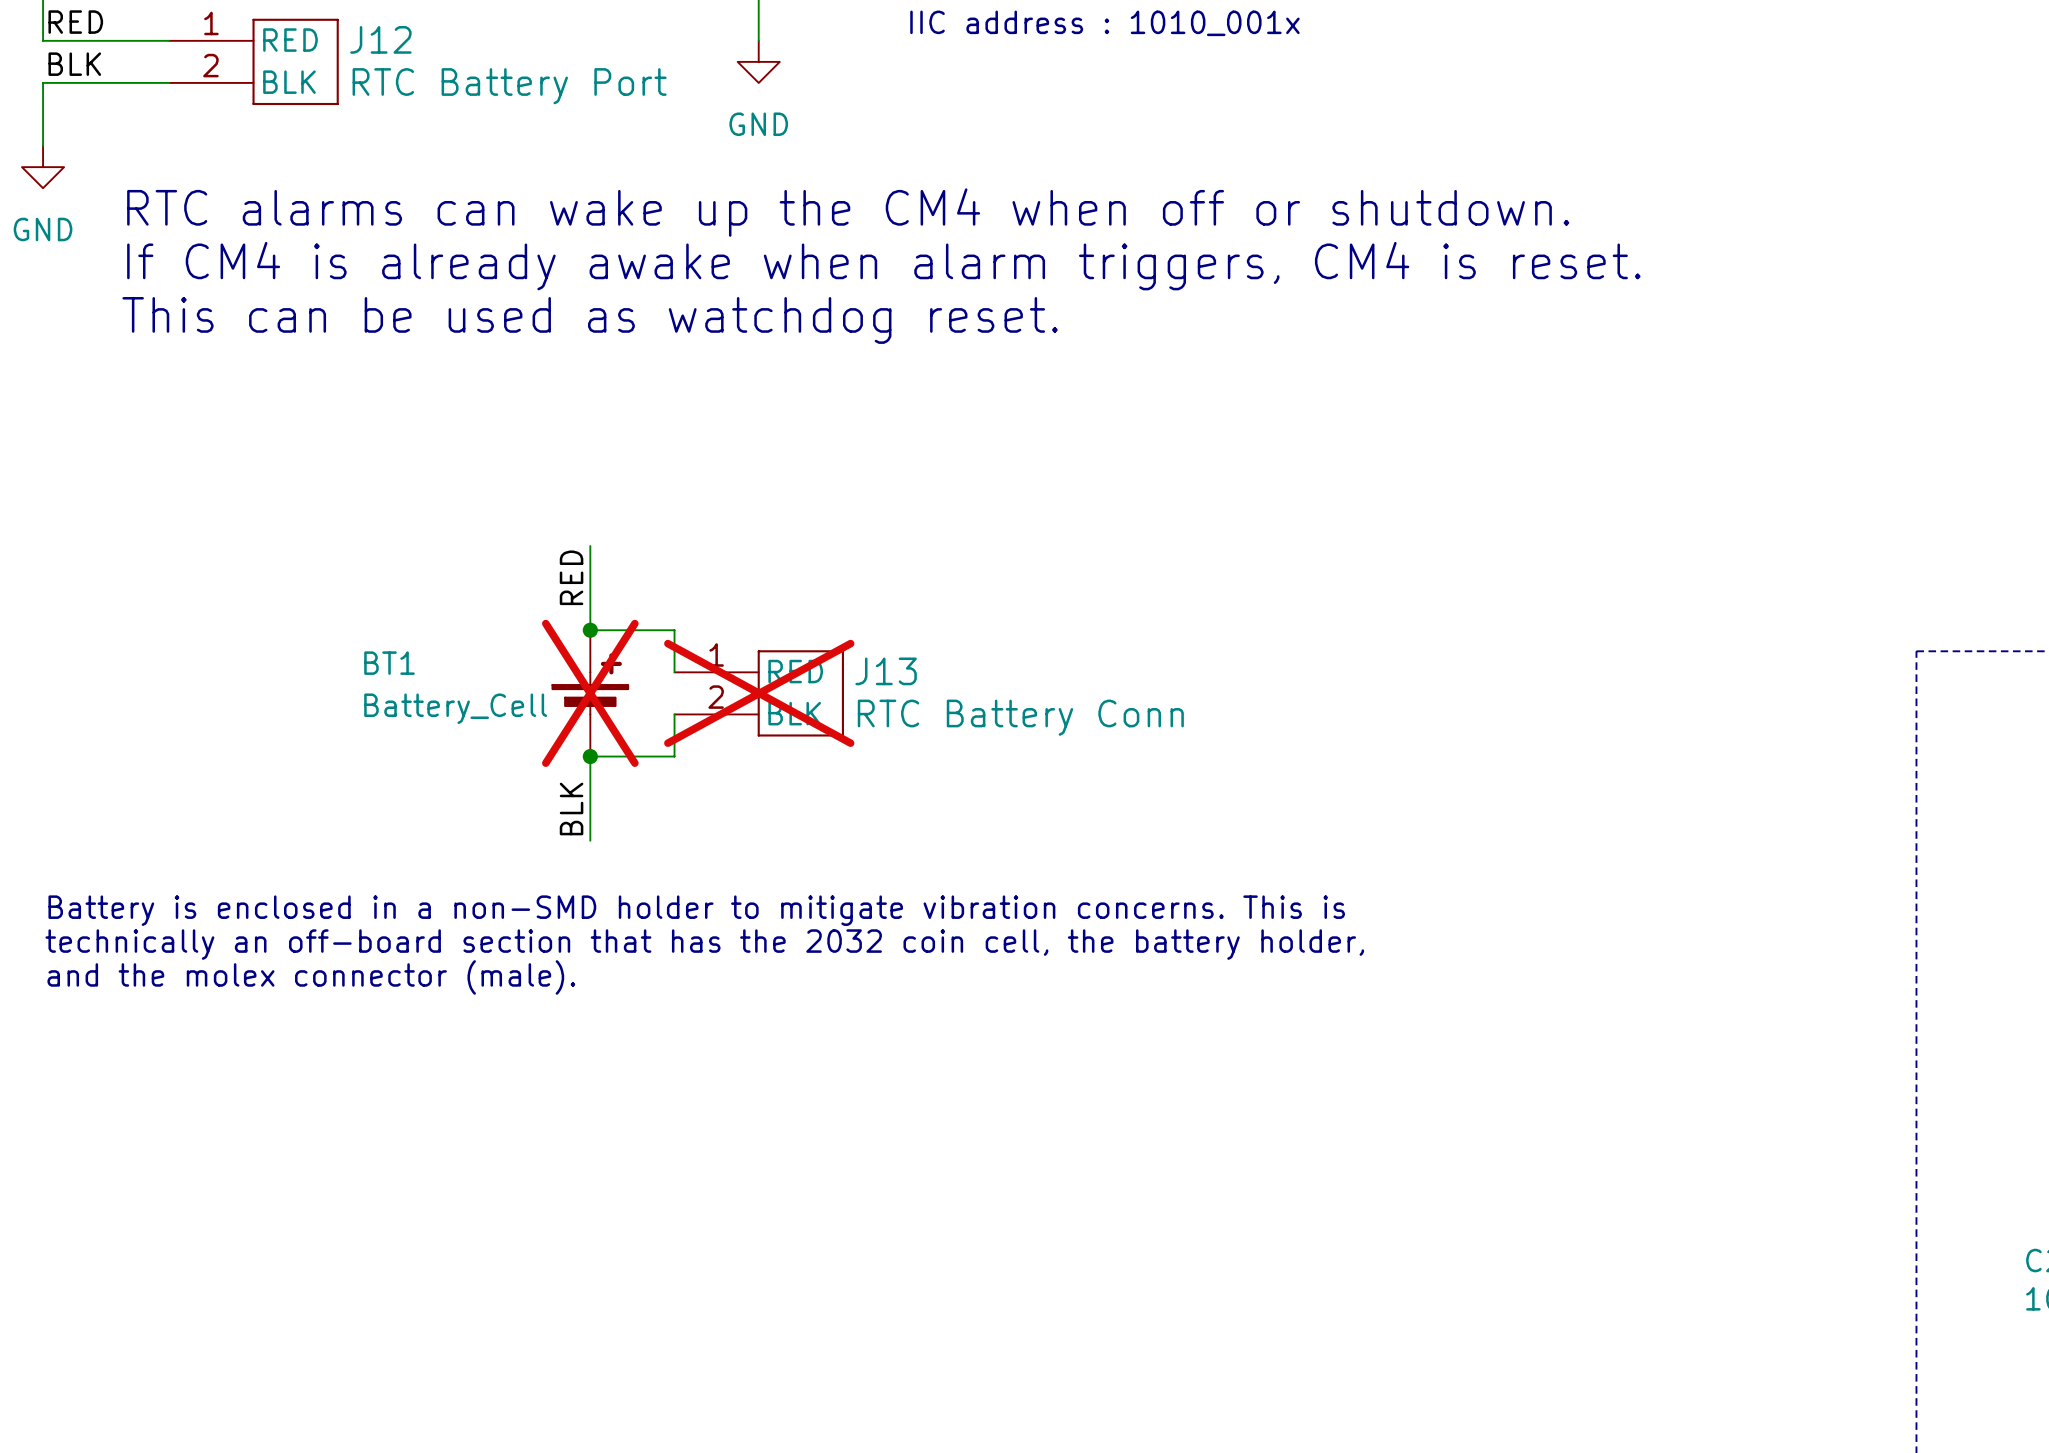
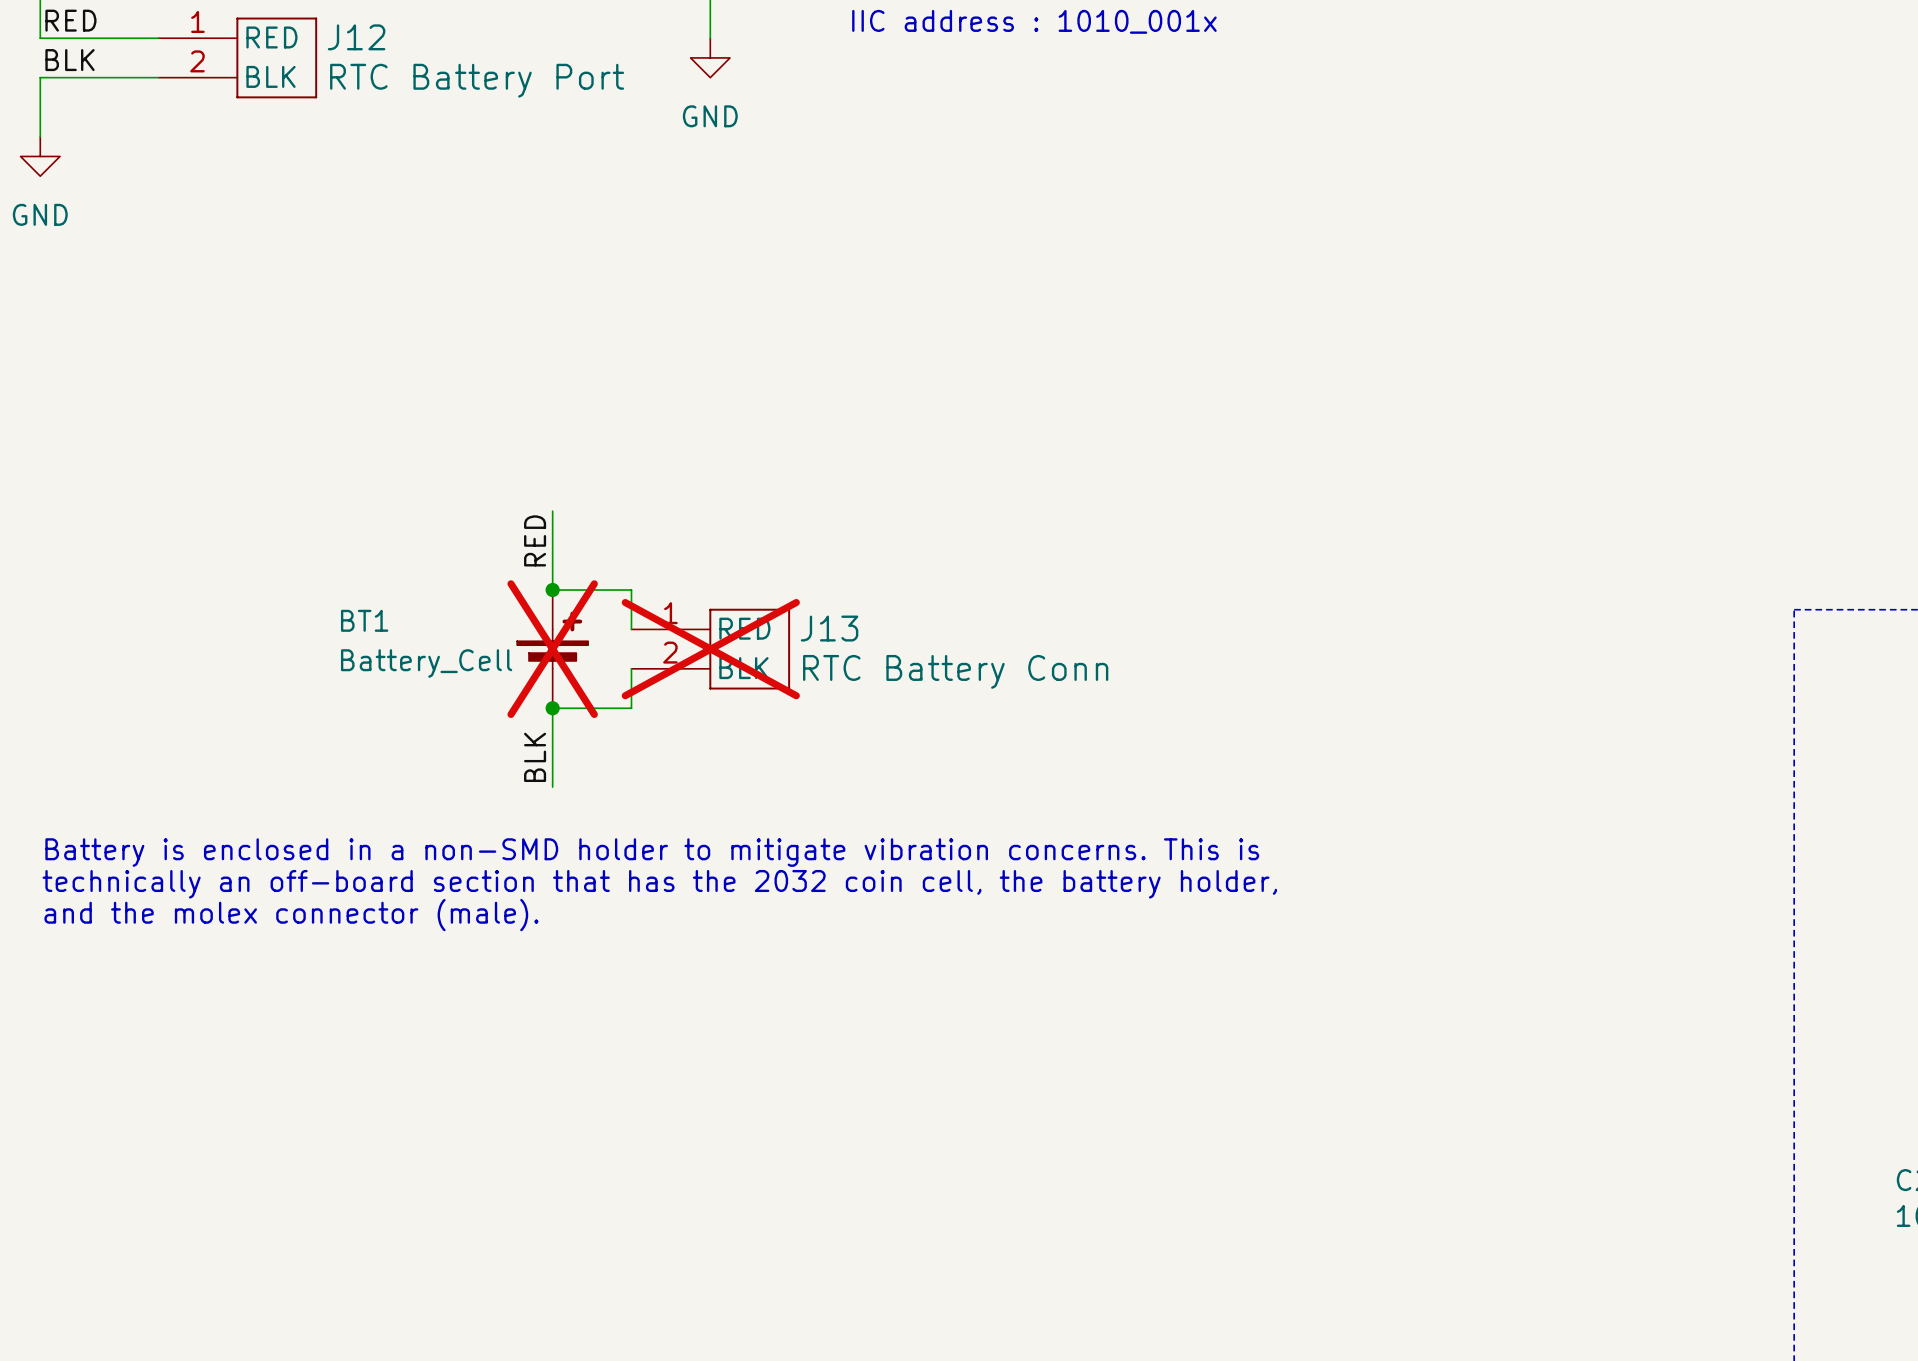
text: RTC alarms can wake up the CM4 when off or shutdown. (848, 212) -> none
text: If CM4 is already awake when alarm triggers, CM4 is reset. (883, 266) -> none
text: This can be used as watchdog reset. (590, 320) -> none

